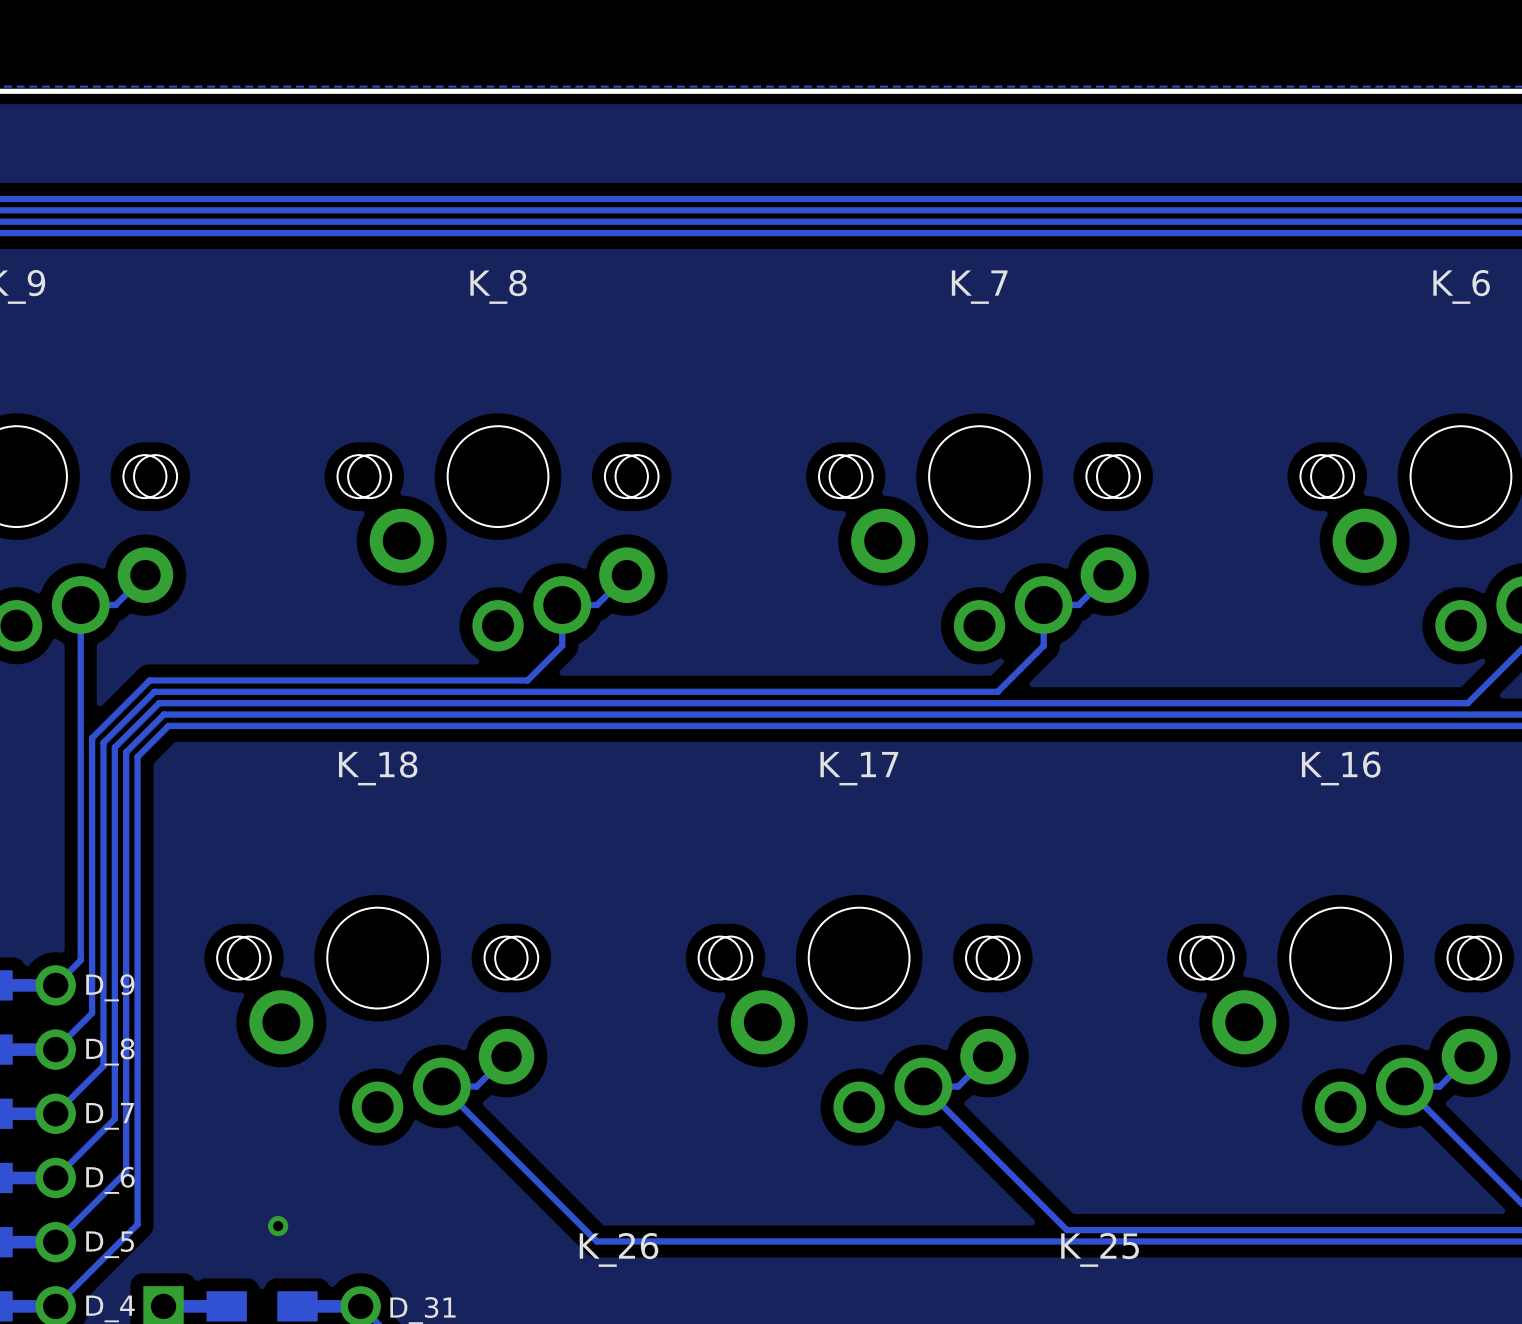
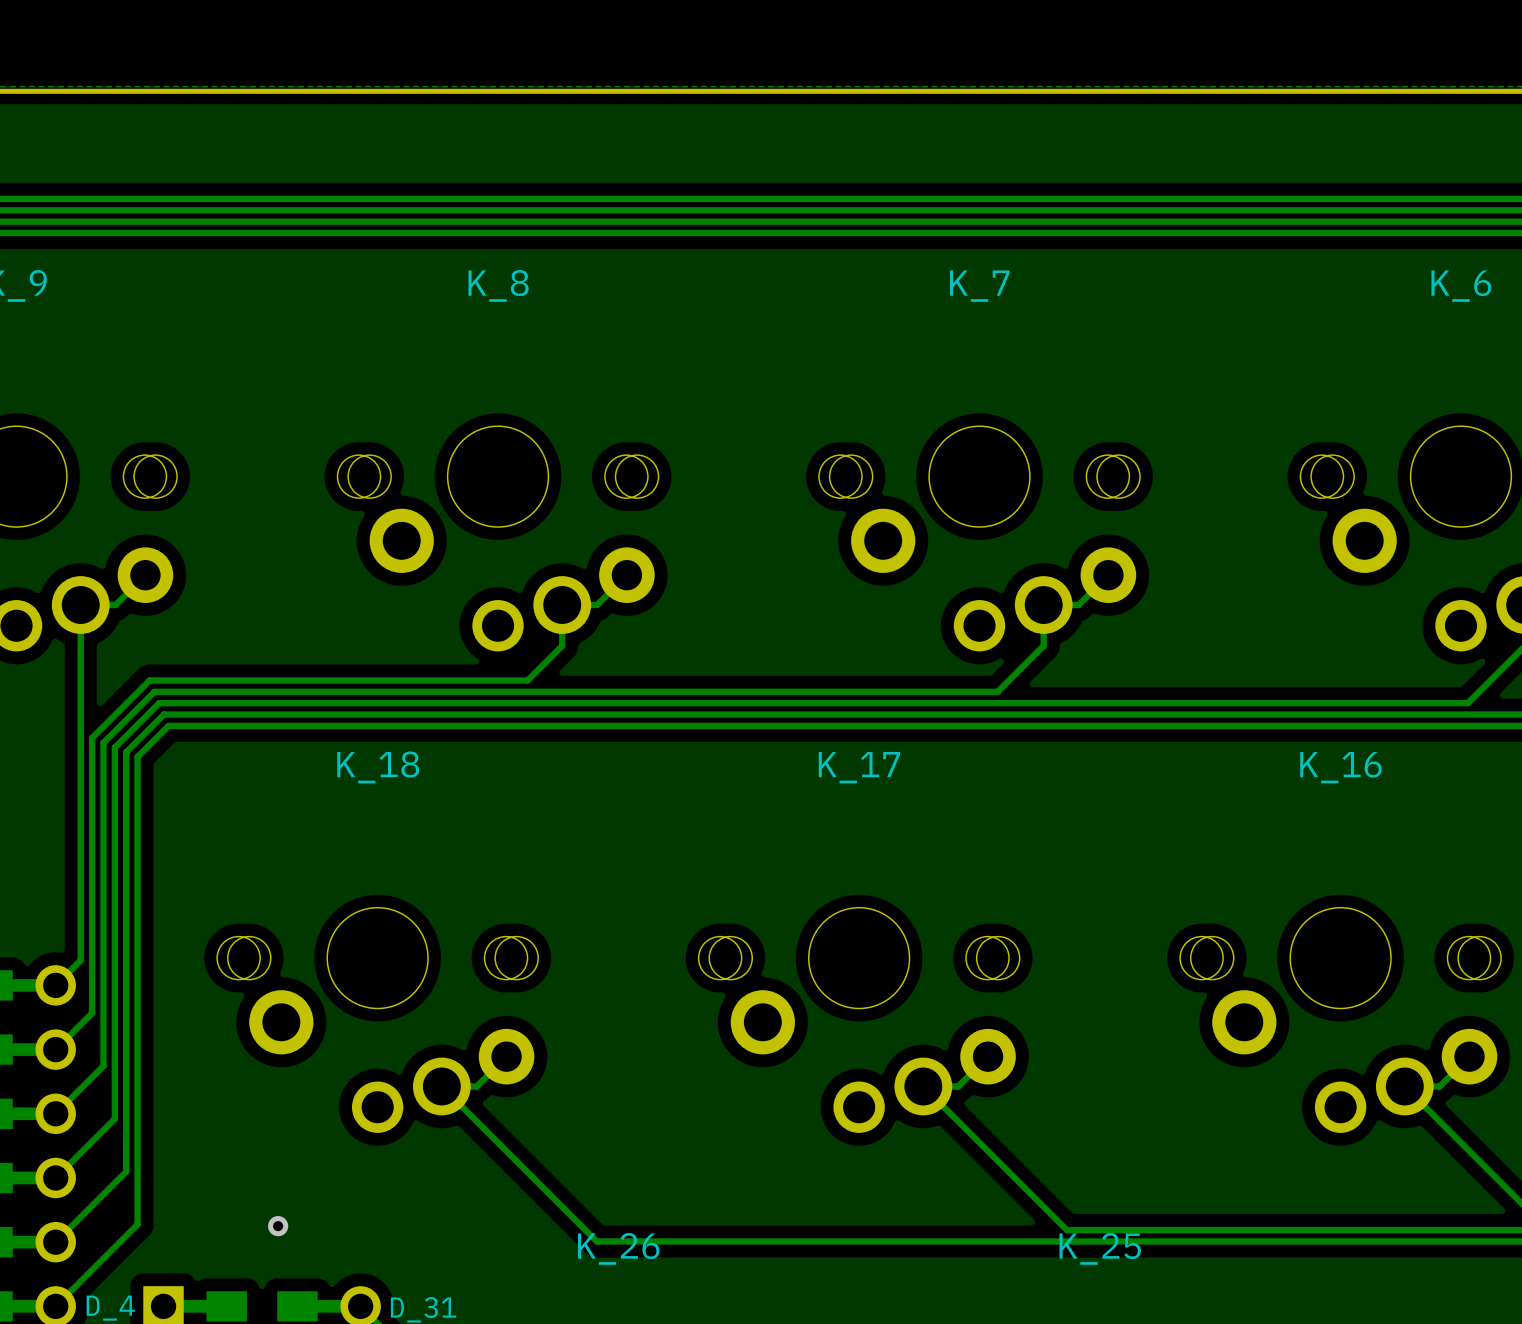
D_9 name: D_9 (110, 987) -> none
D_8 name: D_8 (110, 1051) -> none
D_7 name: D_7 (110, 1116) -> none
D_6 name: D_6 (110, 1180) -> none
D_5 name: D_5 (110, 1244) -> none

